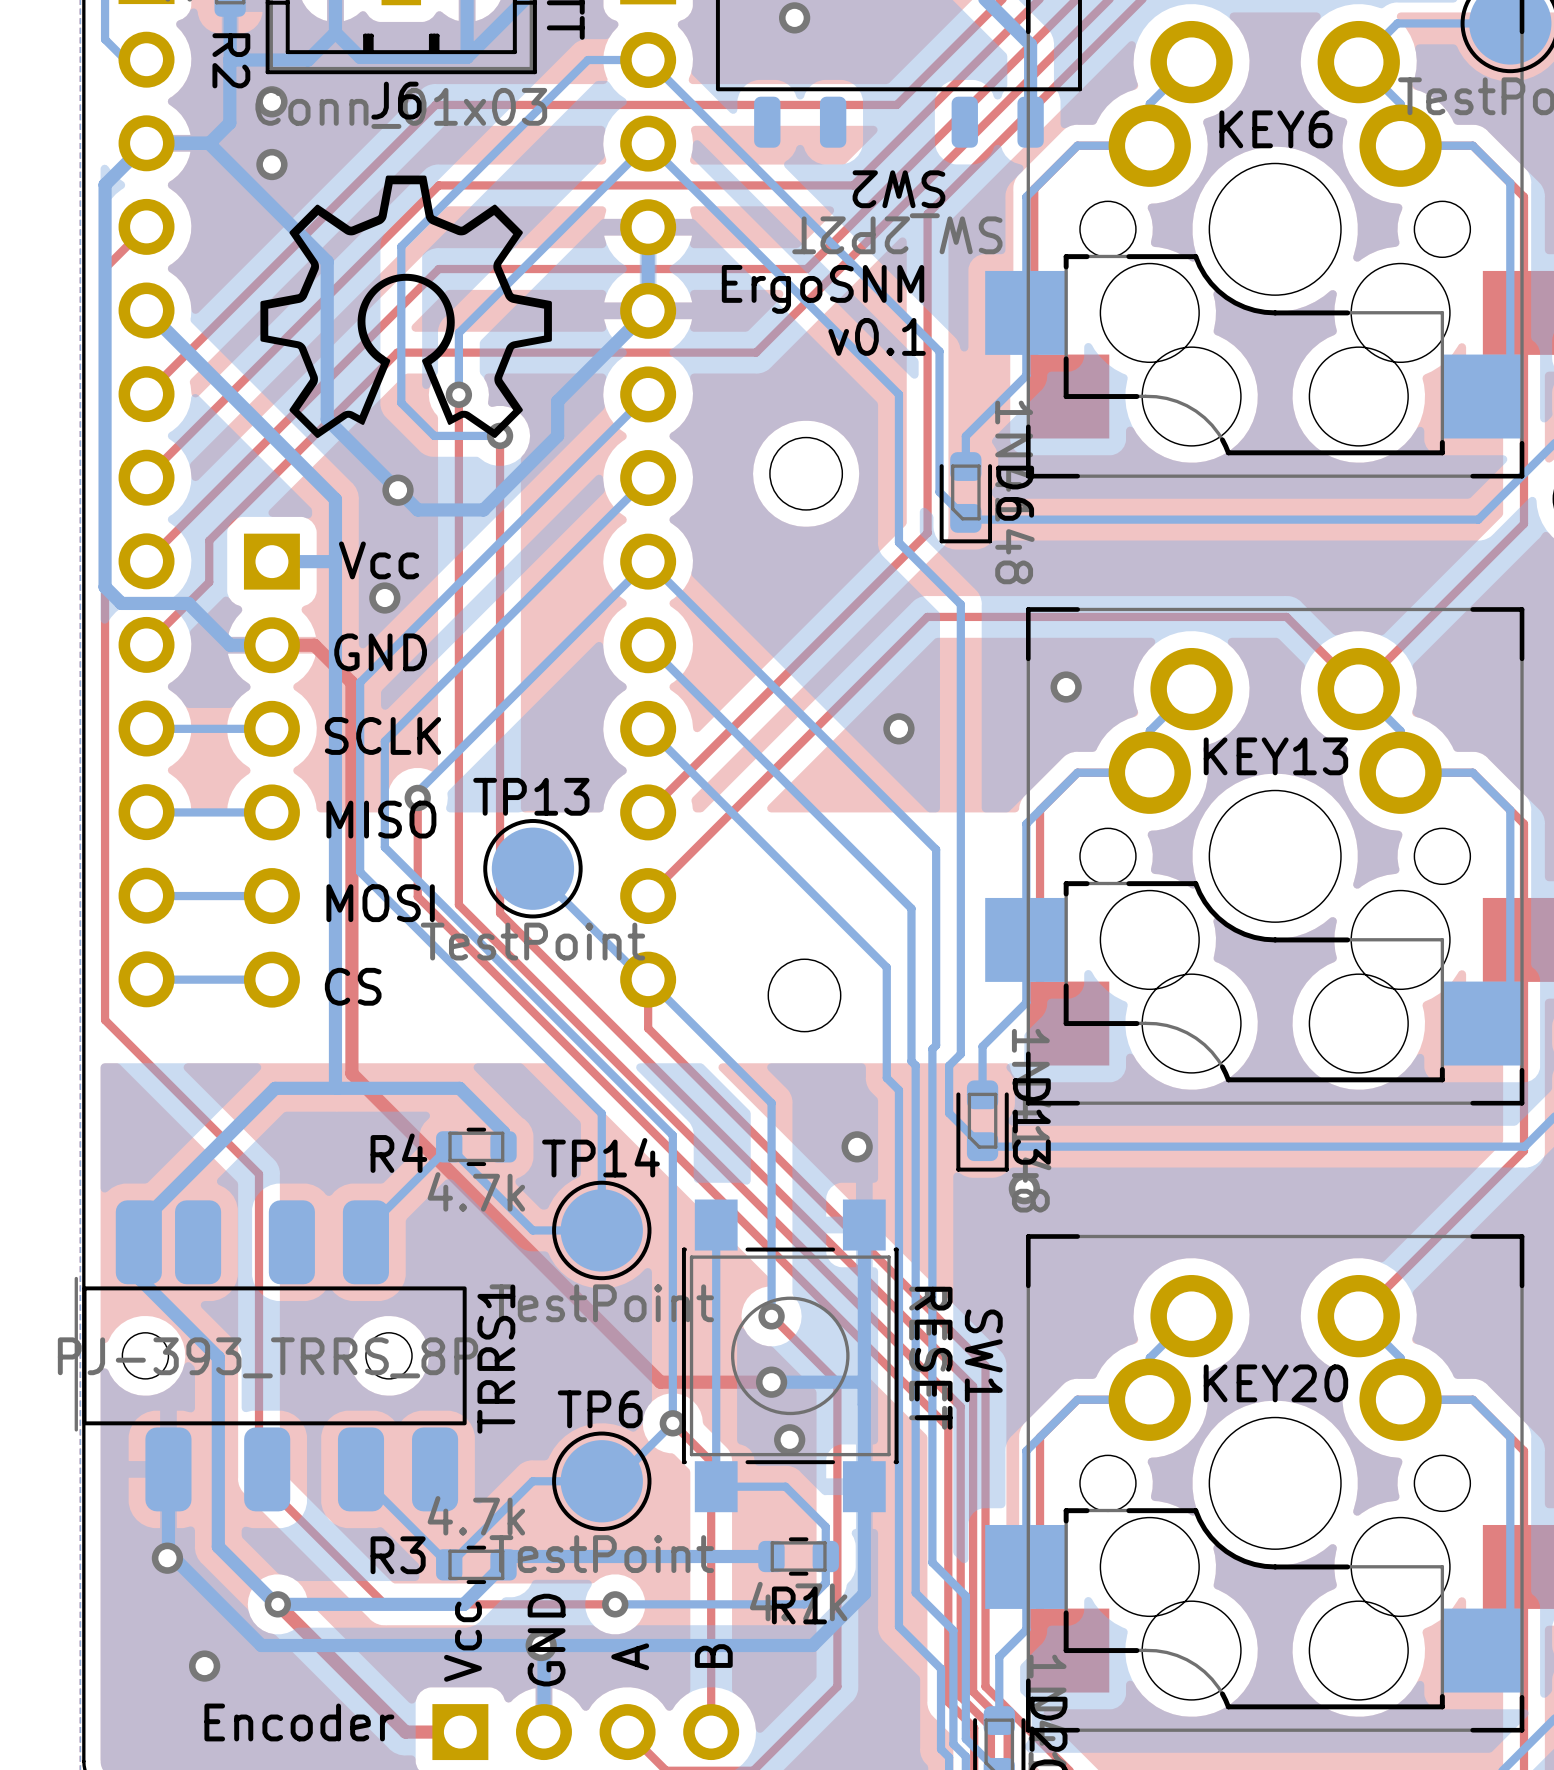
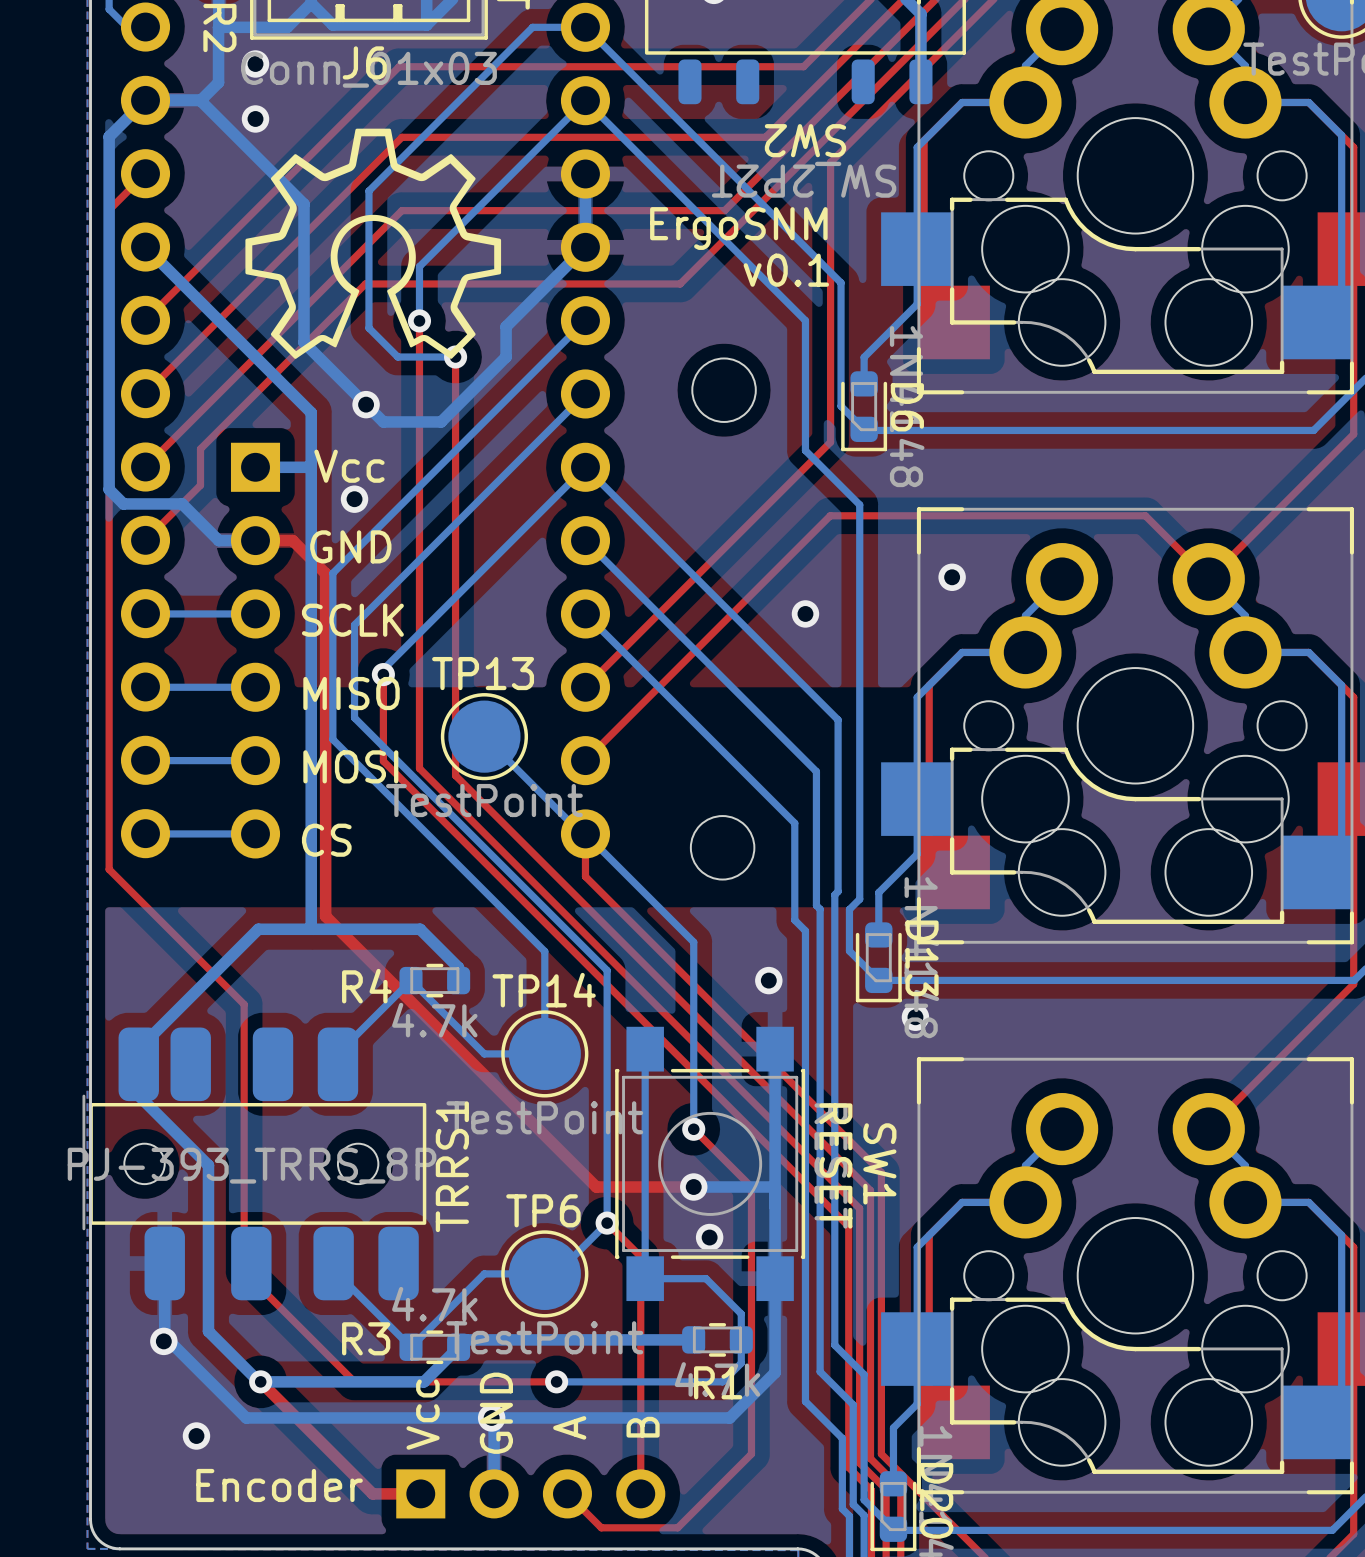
KEY6 name: KEY6 (1275, 129) -> none
KEY13 name: KEY13 (1275, 756) -> none
KEY20 name: KEY20 (1275, 1383) -> none

